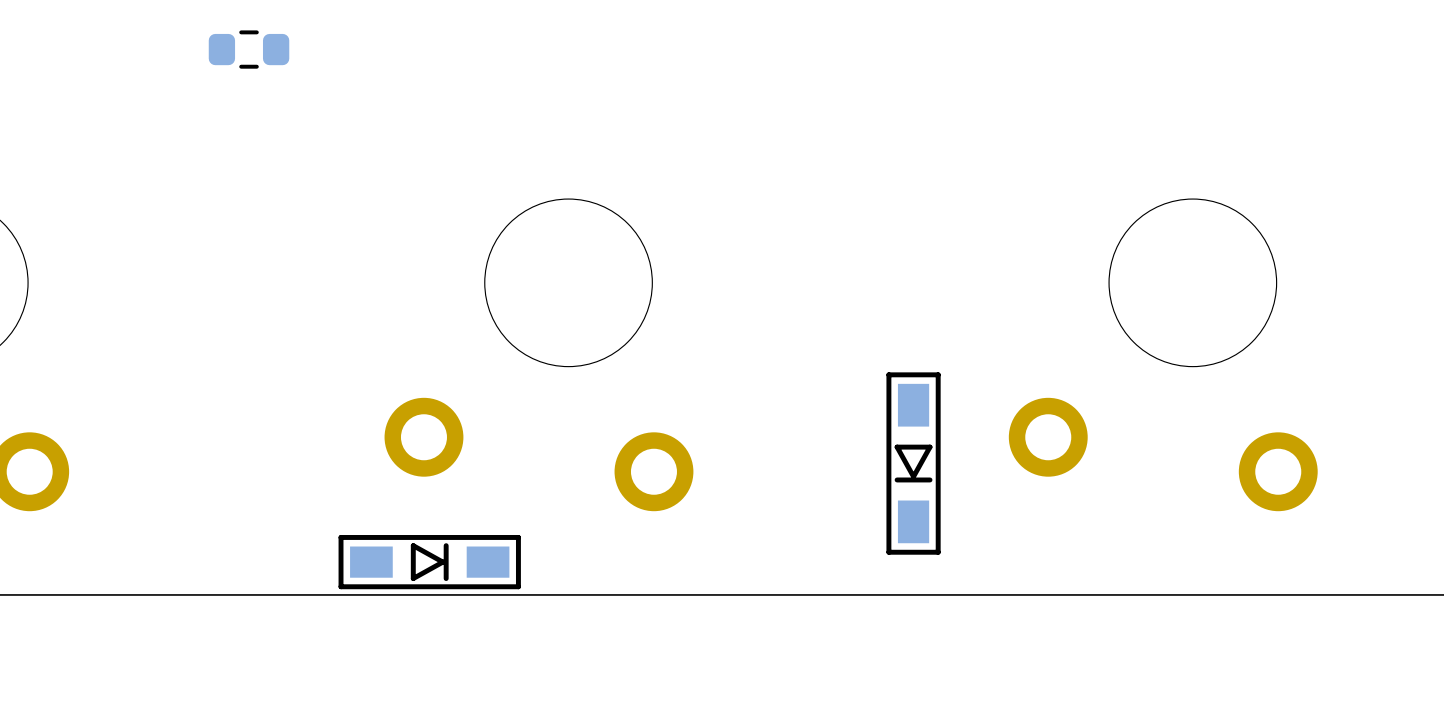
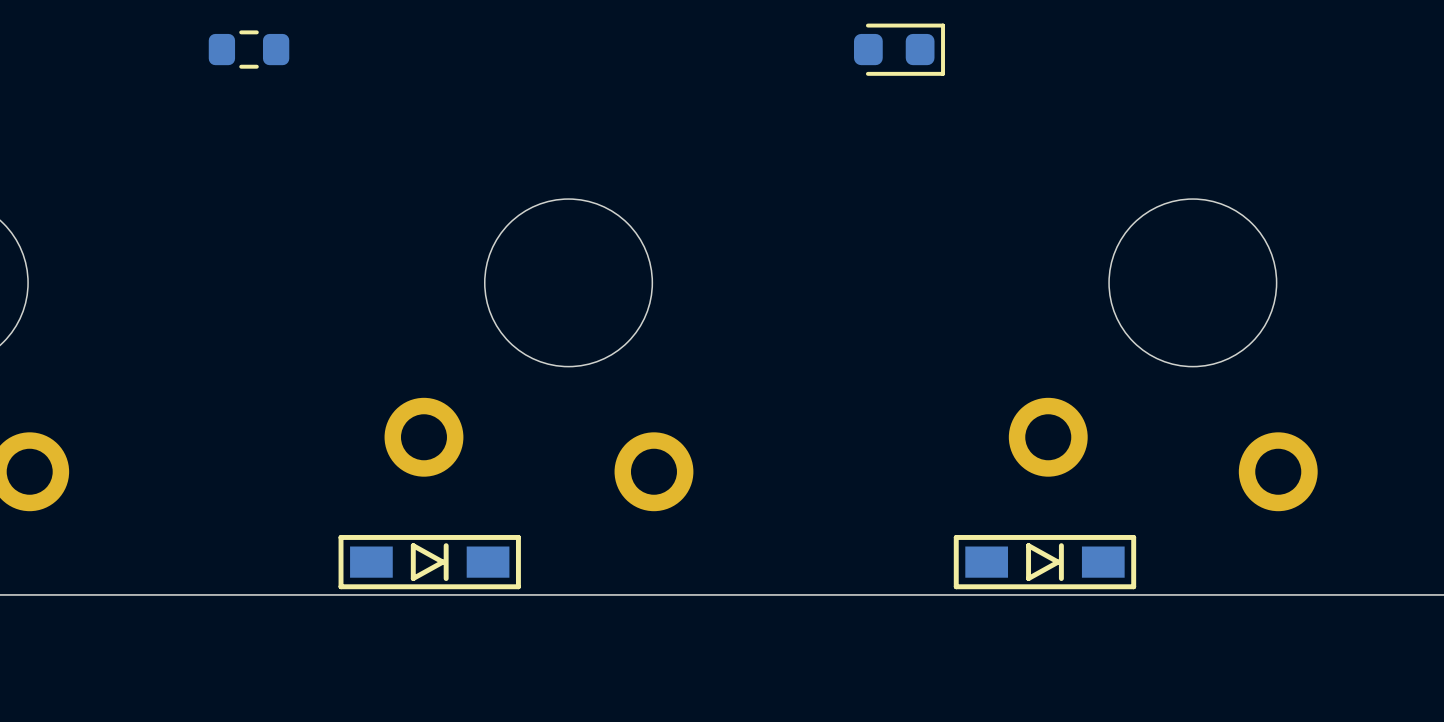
part: none -> (899, 49)
part rotation: 0° (913, 463) -> 90° counterclockwise (1044, 562)
part position: (913, 463) -> (1044, 562)

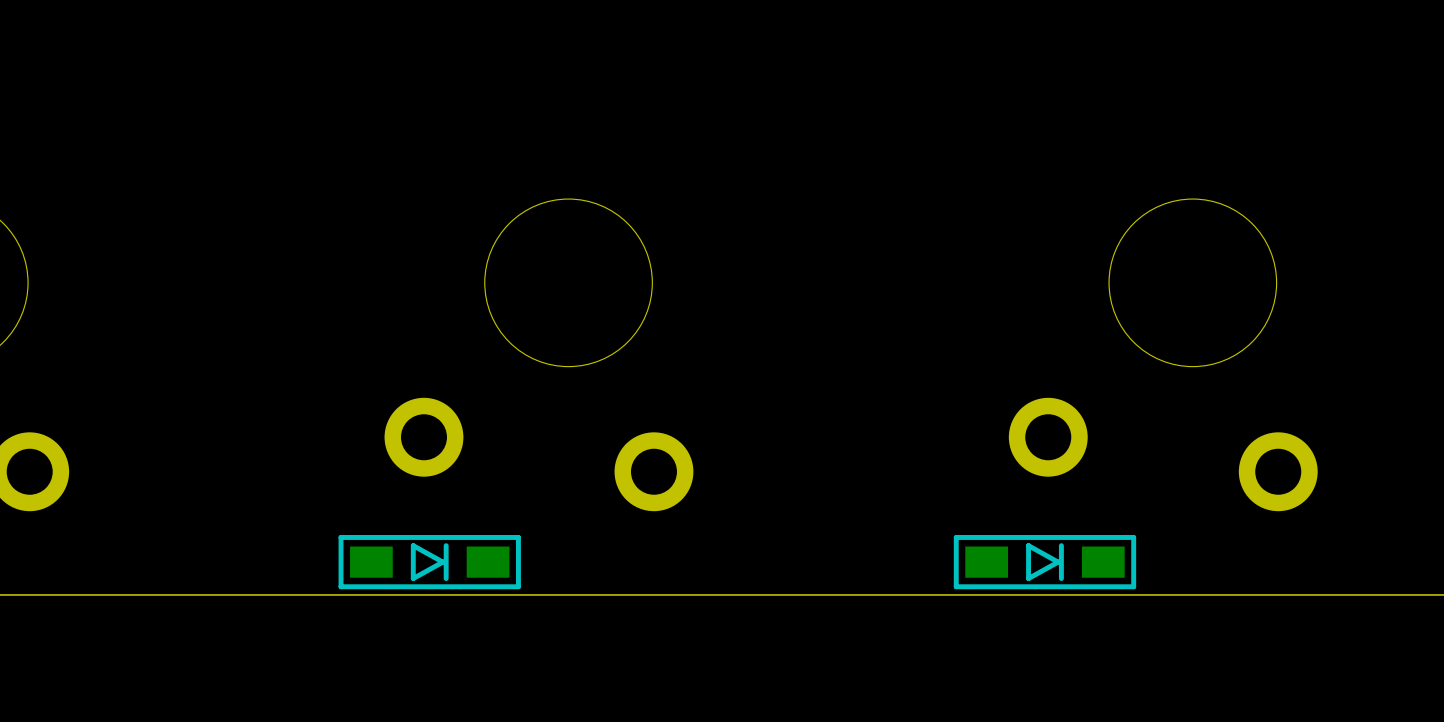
part: (249, 49) -> none
part: (899, 49) -> none

